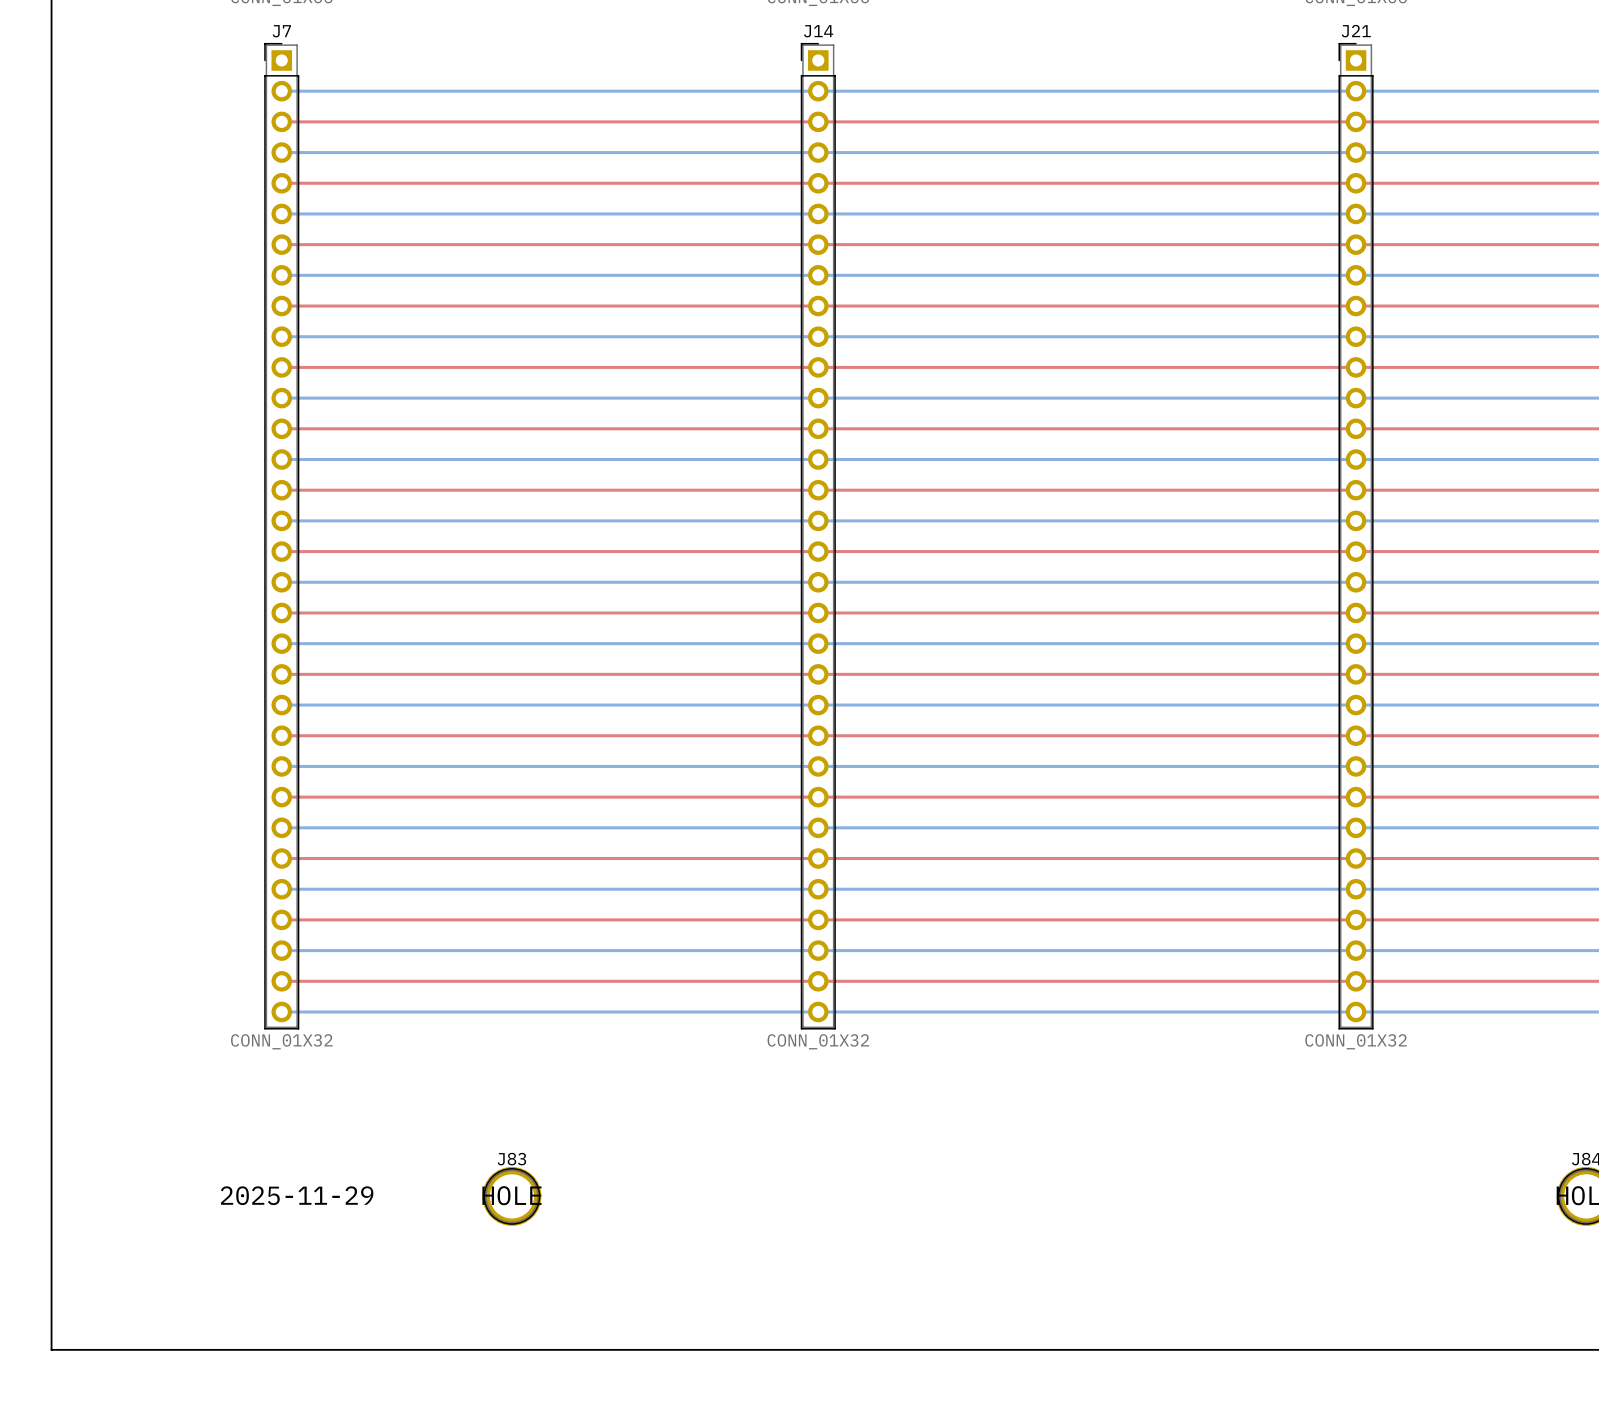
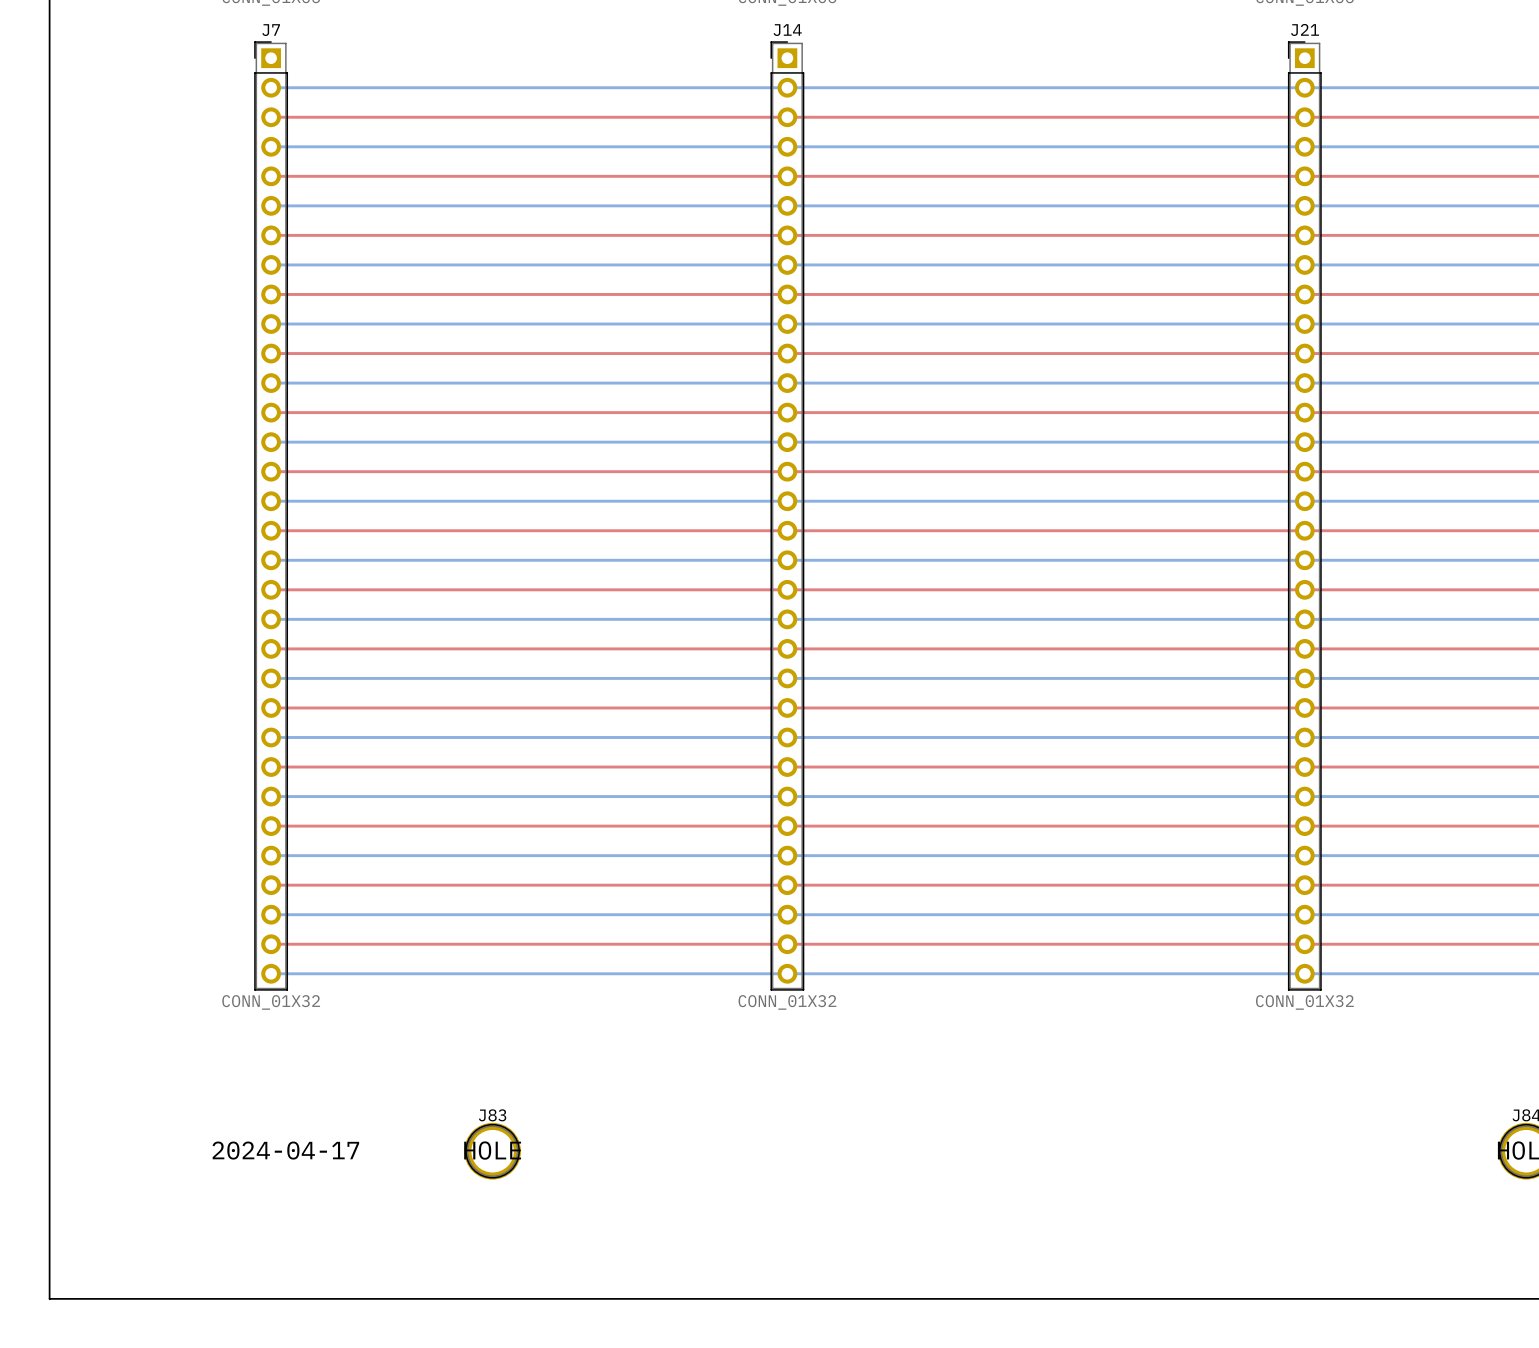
text: 2025-11-29 (297, 1195) -> 2024-04-17 (285, 1150)

